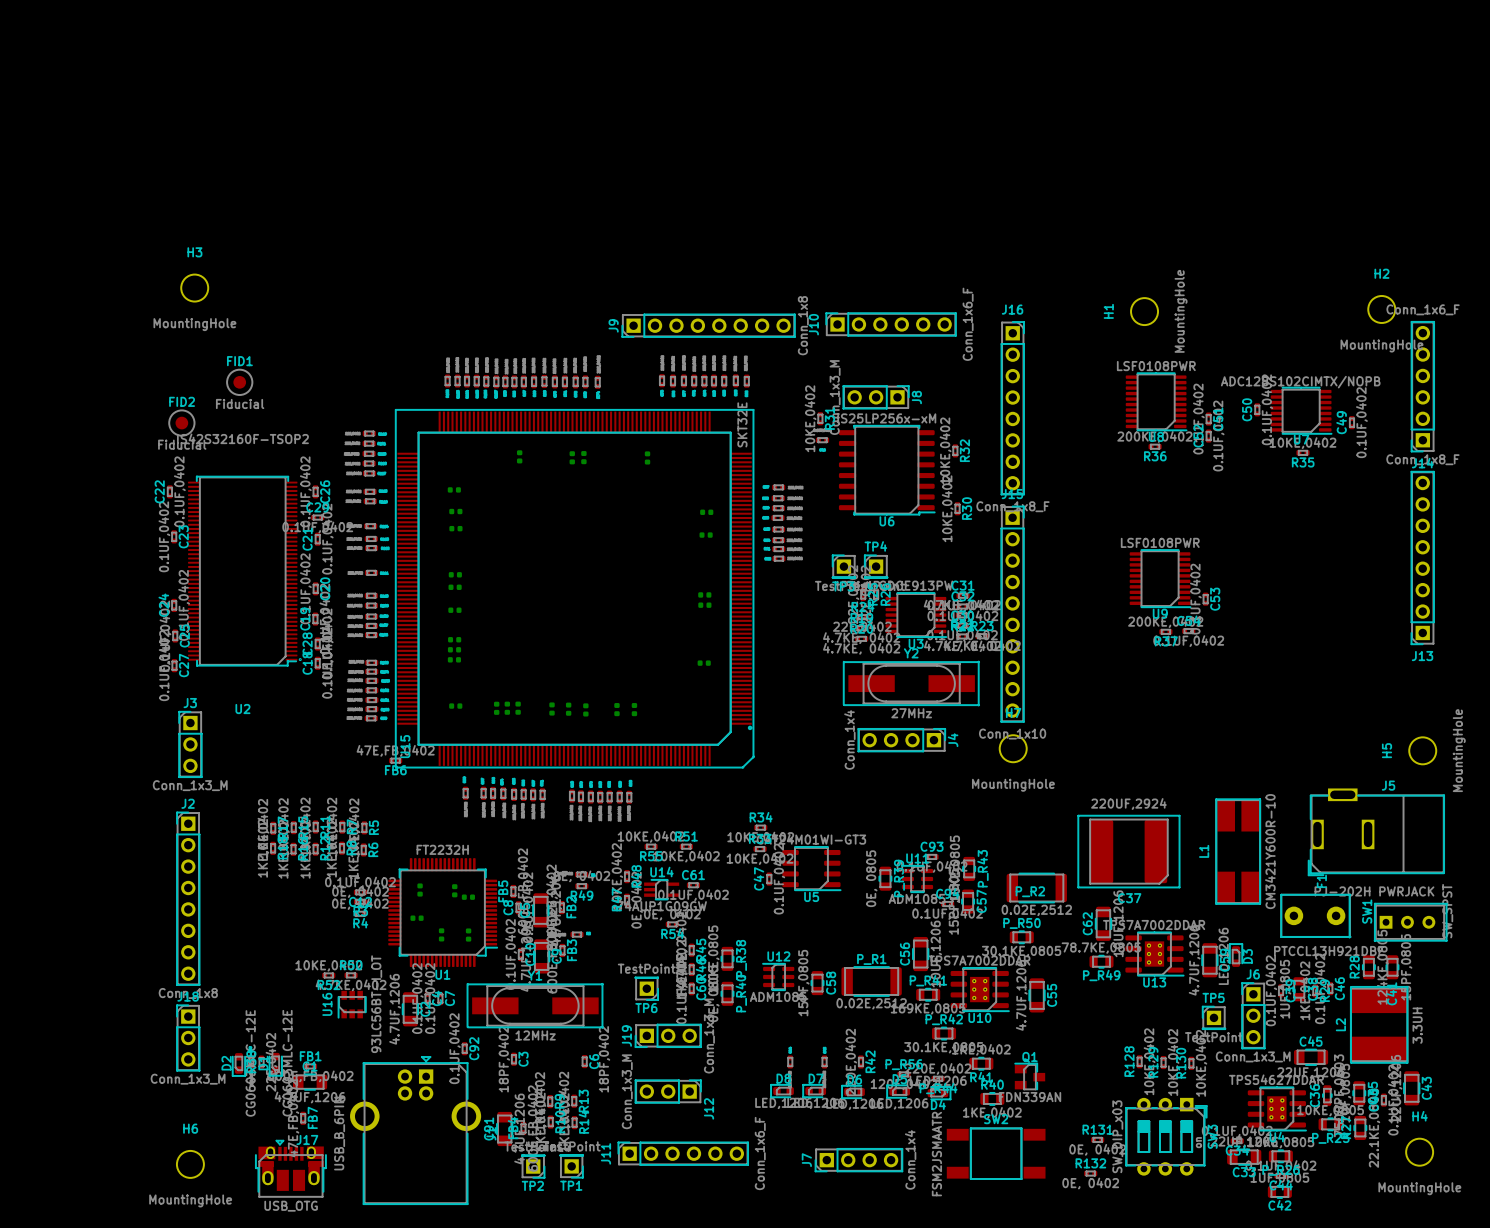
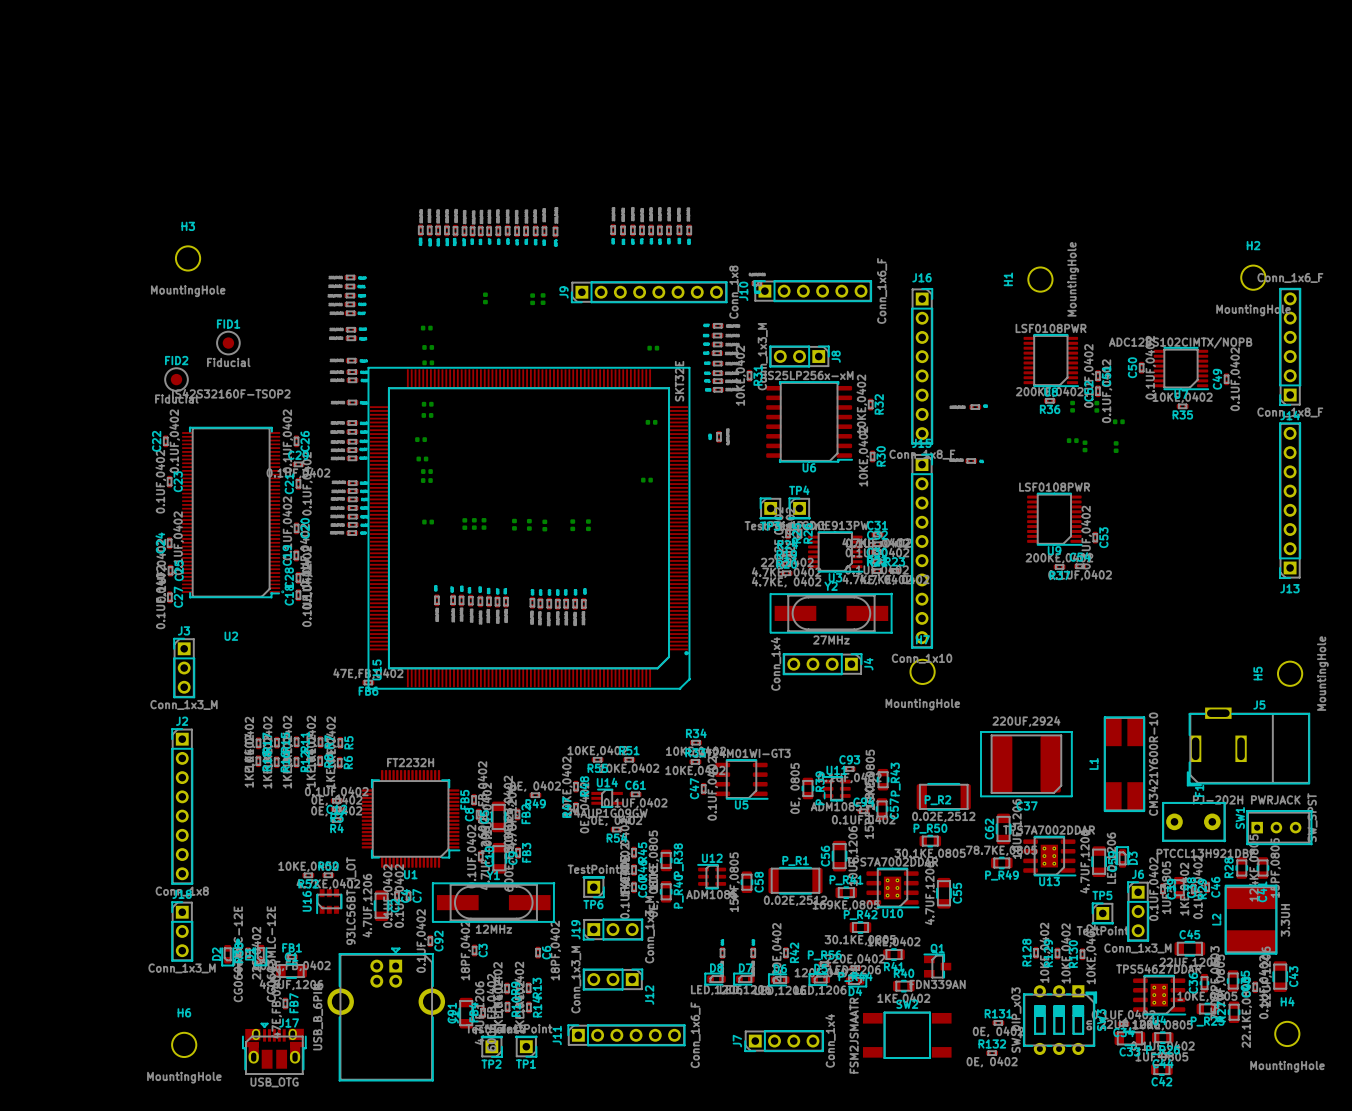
part: none -> (485, 298)
part: none -> (532, 299)
part: none -> (543, 299)
part: none -> (426, 328)
part position: (662, 380) -> (613, 230)
part position: (683, 380) -> (632, 230)
part position: (735, 380) -> (679, 230)
part position: (447, 381) -> (420, 230)
part position: (457, 381) -> (429, 230)
part position: (466, 381) -> (438, 230)
part position: (476, 381) -> (446, 230)
part position: (486, 381) -> (455, 230)
part position: (496, 381) -> (464, 231)
part position: (505, 381) -> (472, 231)
part position: (514, 381) -> (480, 231)
part position: (523, 381) -> (489, 231)
part position: (534, 381) -> (498, 231)
part position: (544, 381) -> (507, 230)
part position: (554, 381) -> (517, 231)
part position: (564, 381) -> (526, 231)
part position: (575, 381) -> (535, 231)
part position: (585, 381) -> (544, 231)
part position: (672, 381) -> (623, 230)
part position: (694, 381) -> (642, 230)
part position: (704, 381) -> (651, 230)
part position: (713, 381) -> (659, 230)
part position: (724, 381) -> (668, 230)
part position: (746, 381) -> (689, 230)
part position: (597, 382) -> (555, 231)
part: none -> (428, 347)
part: none -> (653, 348)
part: none -> (428, 362)
part position: (369, 433) -> (350, 277)
part position: (822, 440) -> (757, 283)
part position: (369, 443) -> (350, 286)
part: none -> (427, 404)
part position: (369, 453) -> (350, 295)
part: none -> (1072, 406)
part: none -> (1096, 406)
part: (519, 456) -> none
part: (572, 457) -> none
part: (583, 457) -> none
part: (647, 457) -> none
part position: (369, 463) -> (350, 304)
part: none -> (427, 415)
part: none -> (651, 422)
part: none -> (1118, 421)
part position: (369, 473) -> (350, 313)
part position: (778, 487) -> (717, 325)
part position: (370, 491) -> (351, 329)
part: none -> (1072, 440)
part: none -> (1085, 446)
part position: (778, 498) -> (717, 335)
part: none -> (1116, 447)
part position: (370, 501) -> (351, 338)
part position: (778, 508) -> (717, 344)
part: (706, 512) -> none
part position: (777, 517) -> (717, 353)
part: none -> (426, 471)
part position: (370, 526) -> (351, 360)
part: (455, 528) -> none
part position: (778, 529) -> (717, 363)
part: none -> (426, 480)
part position: (371, 538) -> (352, 372)
part position: (778, 540) -> (717, 373)
part position: (371, 548) -> (352, 380)
part position: (778, 549) -> (717, 381)
part position: (778, 558) -> (718, 389)
part position: (371, 572) -> (352, 402)
part: (455, 574) -> none
part: none -> (428, 522)
part: none -> (474, 523)
part: none -> (484, 523)
part: none -> (464, 524)
part: none -> (514, 524)
part: none -> (529, 524)
part: none -> (544, 525)
part: none -> (572, 525)
part: none -> (588, 525)
part: (455, 587) -> none
part: (704, 594) -> none
part position: (371, 595) -> (352, 423)
part position: (371, 605) -> (352, 431)
part side: bottom (704, 605) -> top (719, 436)
part: (454, 610) -> none
part position: (371, 616) -> (352, 441)
part position: (371, 625) -> (352, 450)
part position: (371, 635) -> (352, 458)
part: (454, 639) -> none
part: (454, 649) -> none
part: (454, 659) -> none
part position: (371, 662) -> (352, 483)
part: (704, 663) -> none
part position: (371, 671) -> (352, 491)
part position: (371, 680) -> (352, 499)
part position: (371, 690) -> (352, 507)
part position: (371, 700) -> (352, 516)
part: (455, 706) -> none
part: (496, 708) -> none
part: (507, 708) -> none
part: (518, 708) -> none
part position: (371, 709) -> (352, 524)
part: (552, 709) -> none
part: (568, 709) -> none
part: (585, 709) -> none
part: (616, 709) -> none
part: (634, 709) -> none
part position: (371, 718) -> (352, 533)
part position: (465, 793) -> (436, 600)
part position: (483, 793) -> (453, 600)
part position: (493, 793) -> (461, 600)
part position: (503, 793) -> (470, 600)
part position: (514, 794) -> (480, 601)
part position: (523, 794) -> (489, 601)
part position: (533, 794) -> (497, 601)
part position: (542, 794) -> (505, 601)
part position: (572, 796) -> (532, 602)
part position: (580, 796) -> (540, 603)
part position: (590, 797) -> (549, 603)
part position: (600, 797) -> (557, 603)
part position: (609, 797) -> (566, 603)
part position: (619, 797) -> (575, 603)
part position: (629, 797) -> (583, 603)
part position: (581, 874) -> (971, 460)
part: (420, 890) -> none
part: (454, 890) -> none
part: (468, 897) -> none
part: (417, 918) -> none
part: (441, 934) -> none
part position: (577, 934) -> (975, 407)
part: (468, 935) -> none

